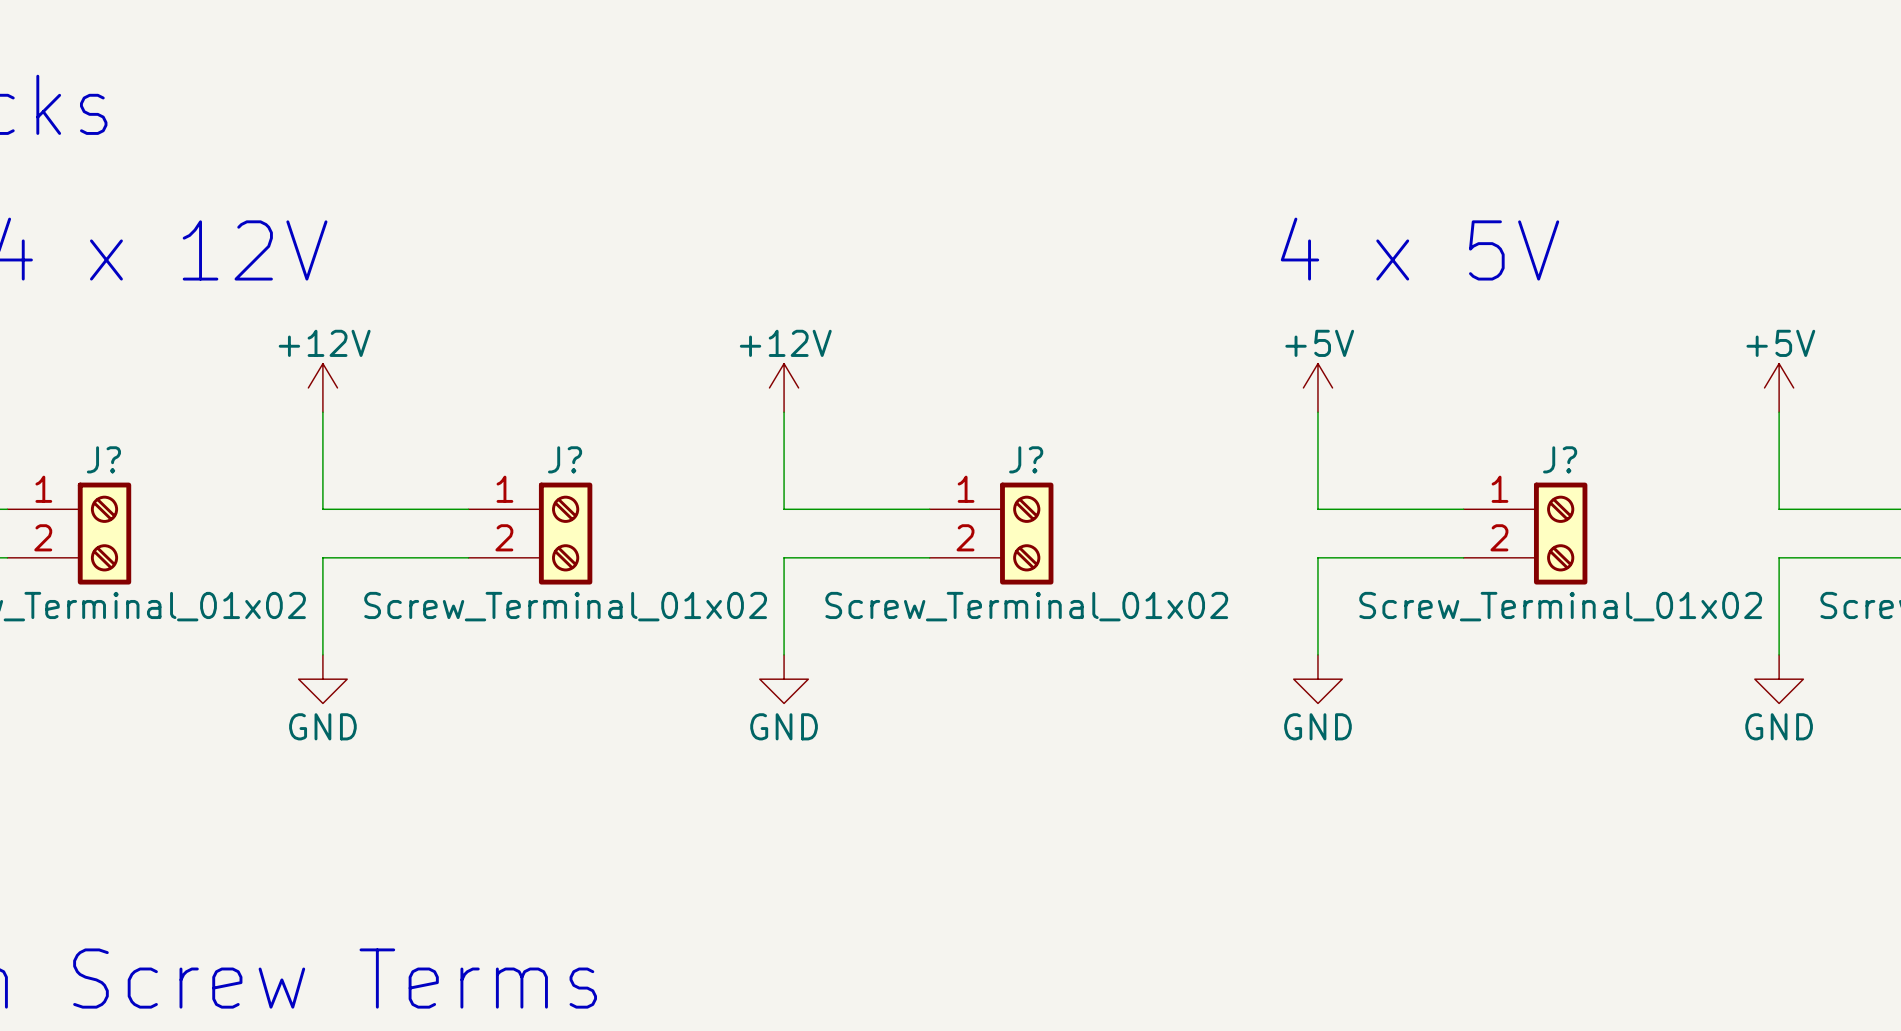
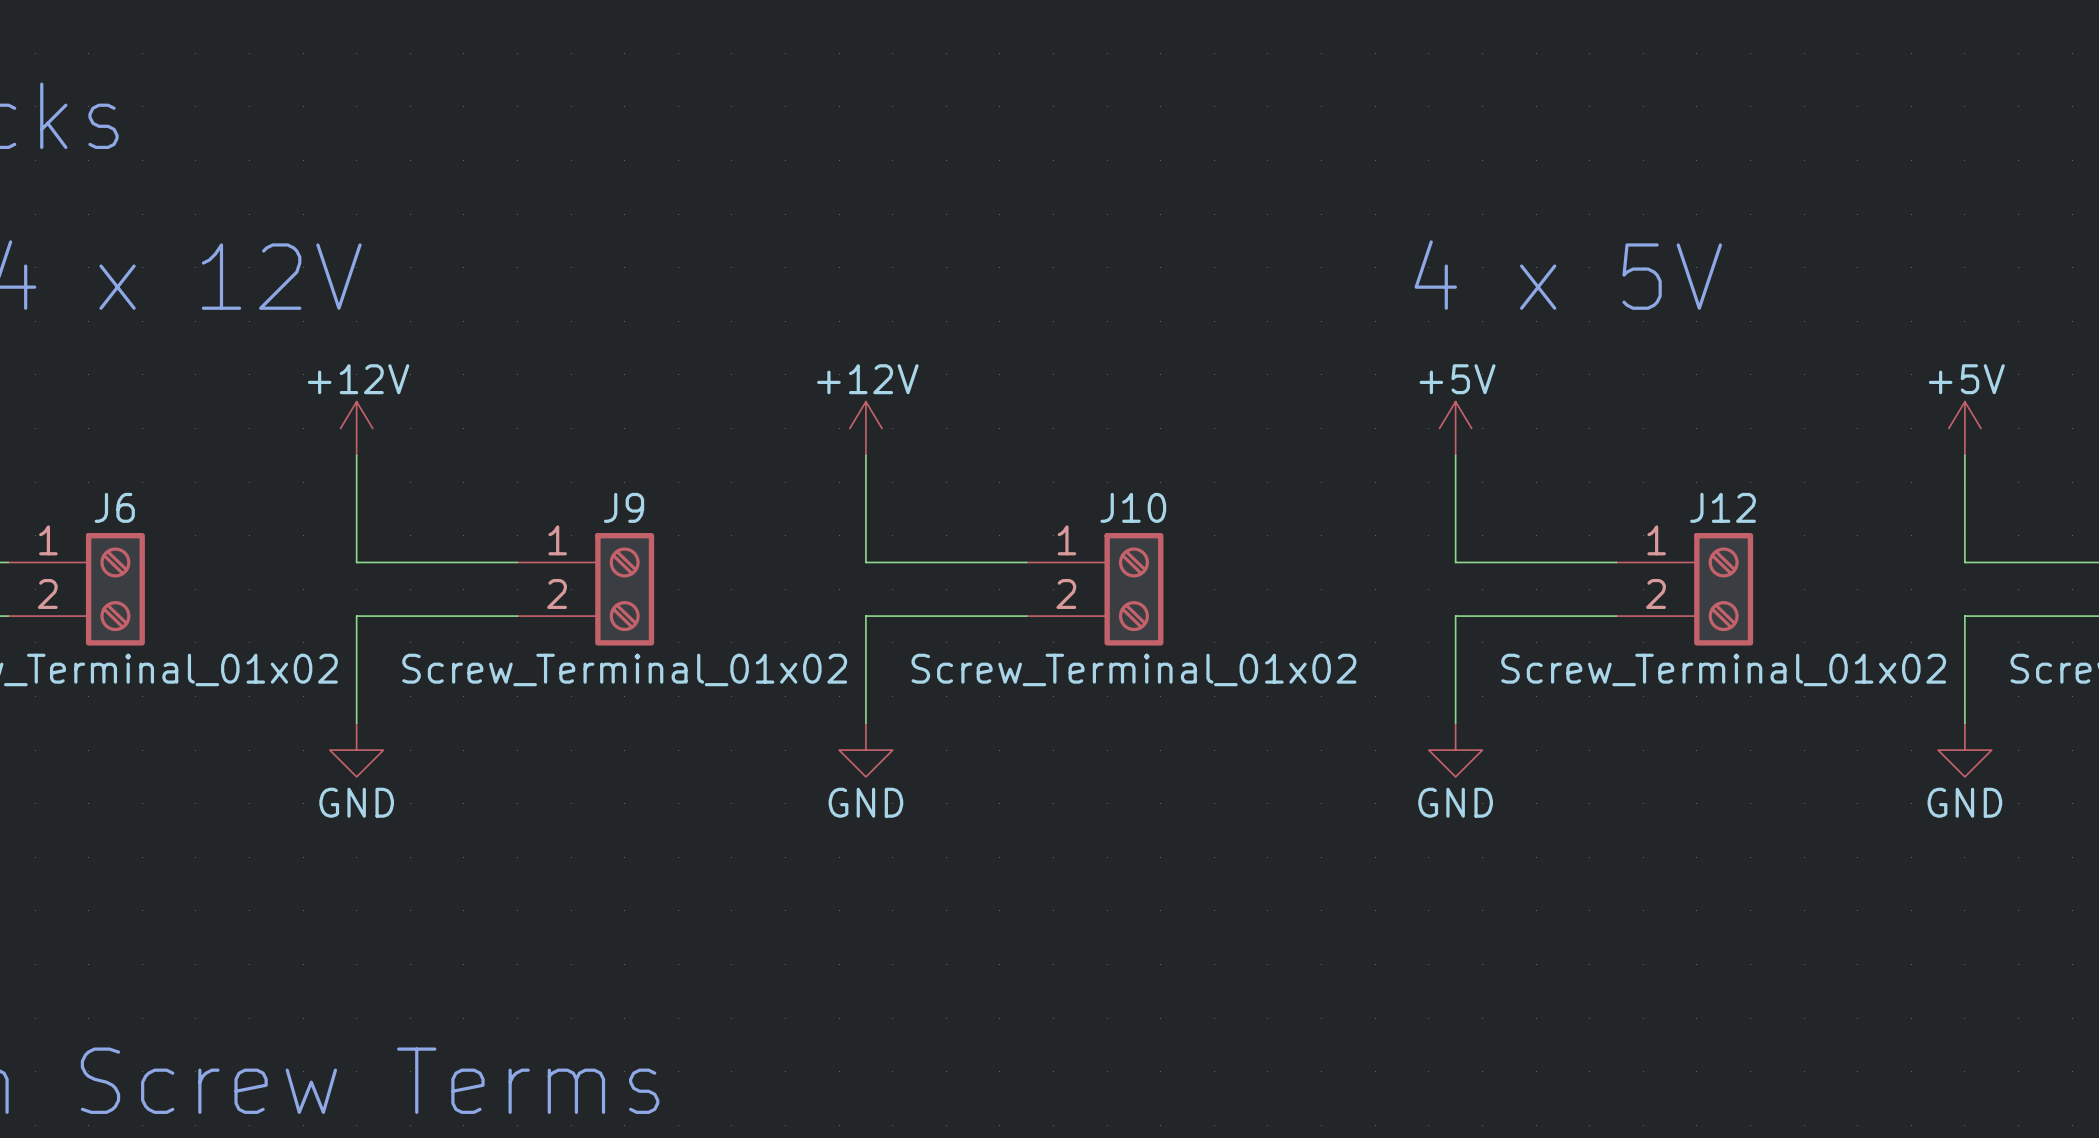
J? name: J? (103, 459) -> J6 (114, 507)
J? name: J? (565, 459) -> J9 (624, 507)
J? name: J? (1026, 459) -> J10 (1133, 507)
J? name: J? (1560, 459) -> J12 (1723, 507)

